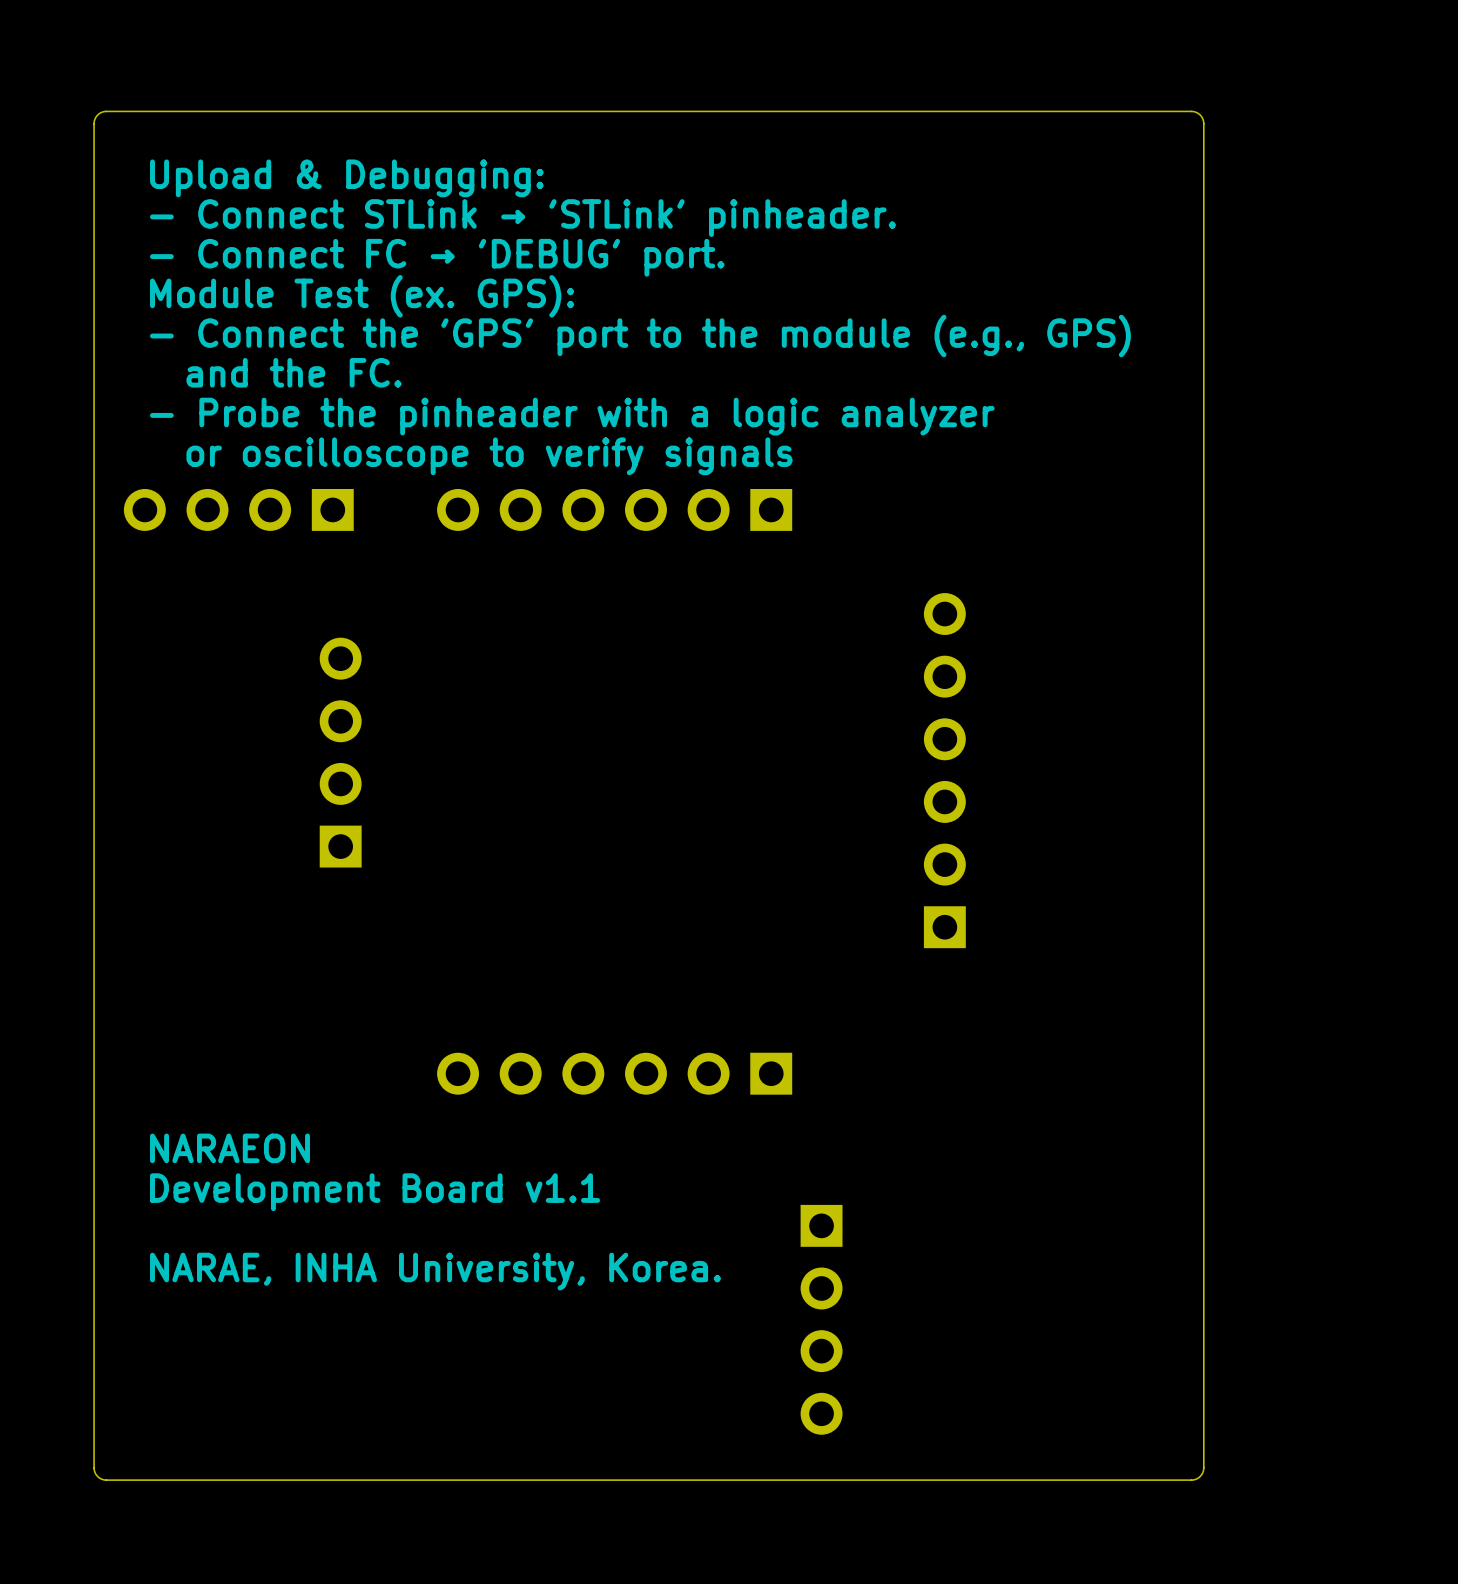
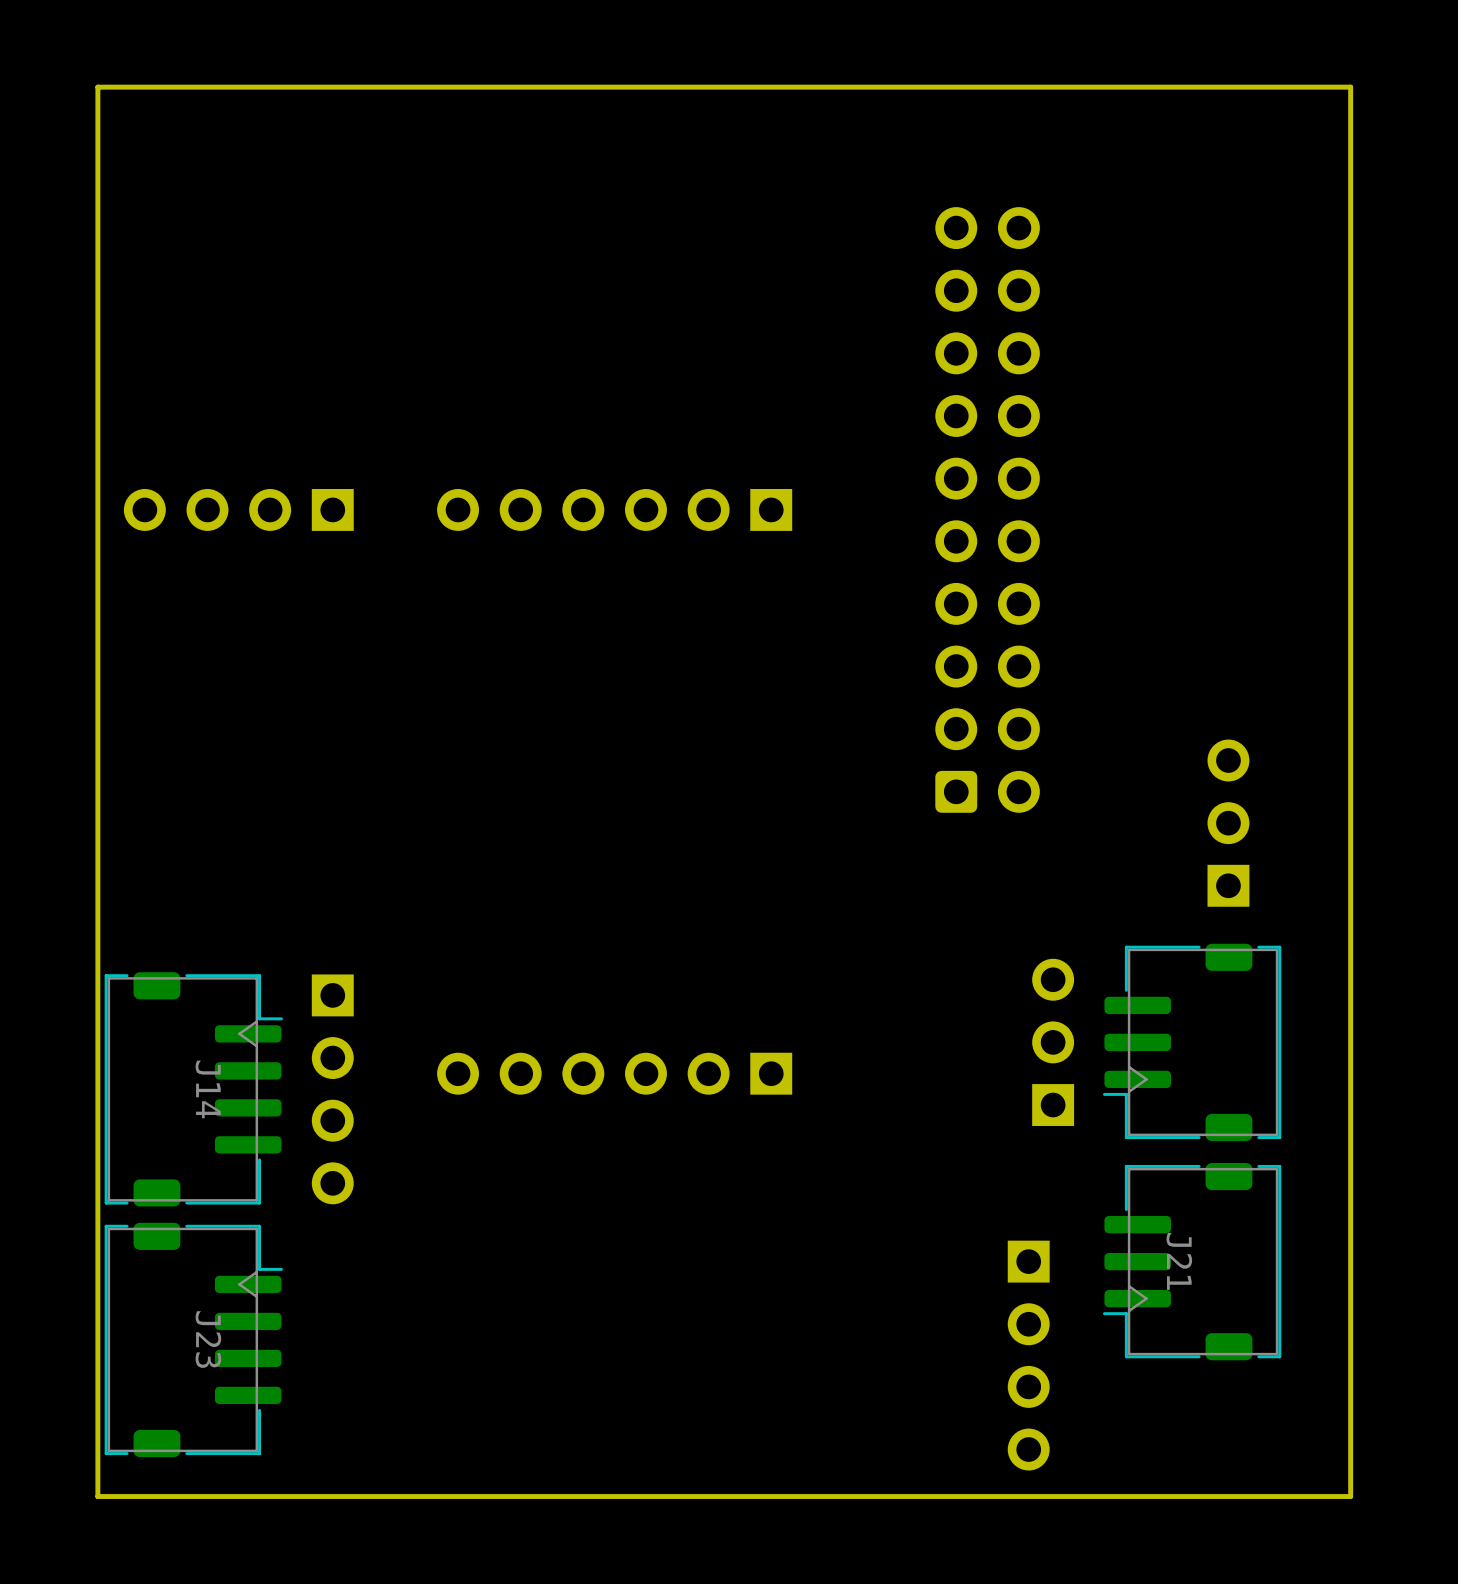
board edge: (1191, 111) (106, 111) (96, 116) (94, 123) (94, 1467) (98, 1477) (106, 1480) (1191, 1480) (1201, 1475) (1203, 1467) (1203, 123) (1200, 115) (1191, 111) -> (1350, 87) (1350, 1496) (97, 1496) (97, 87) (1350, 87)
text: Upload & Debugging: (346, 178) -> none
text: - Connect STLink → 'STLink' pinheader. (523, 218) -> none
text: - Connect FC → 'DEBUG' port. (437, 257) -> none
text: Module Test (ex. GPS): (362, 296) -> none
text: - Connect the 'GPS' port to the module (e.g., GPS) (640, 336) -> none
text: and the FC. (294, 372) -> none
text: - Probe the pinheader with a logic analyzer (572, 416) -> none
text: or oscilloscope to verify signals (489, 456) -> none
part: none -> (987, 509)
part: (340, 752) -> none
part: (944, 770) -> none
part: none -> (1228, 823)
part: none -> (1053, 1042)
part: none -> (1192, 1042)
J14: none -> (193, 1089)
part: none -> (332, 1089)
text: NARAEON (230, 1148) -> none
text: Development Board v1.1 (375, 1192) -> none
J21: none -> (1192, 1261)
text: NARAE, INHA University, Korea. (435, 1271) -> none
part position: (821, 1319) -> (1028, 1355)
J23: none -> (193, 1339)

